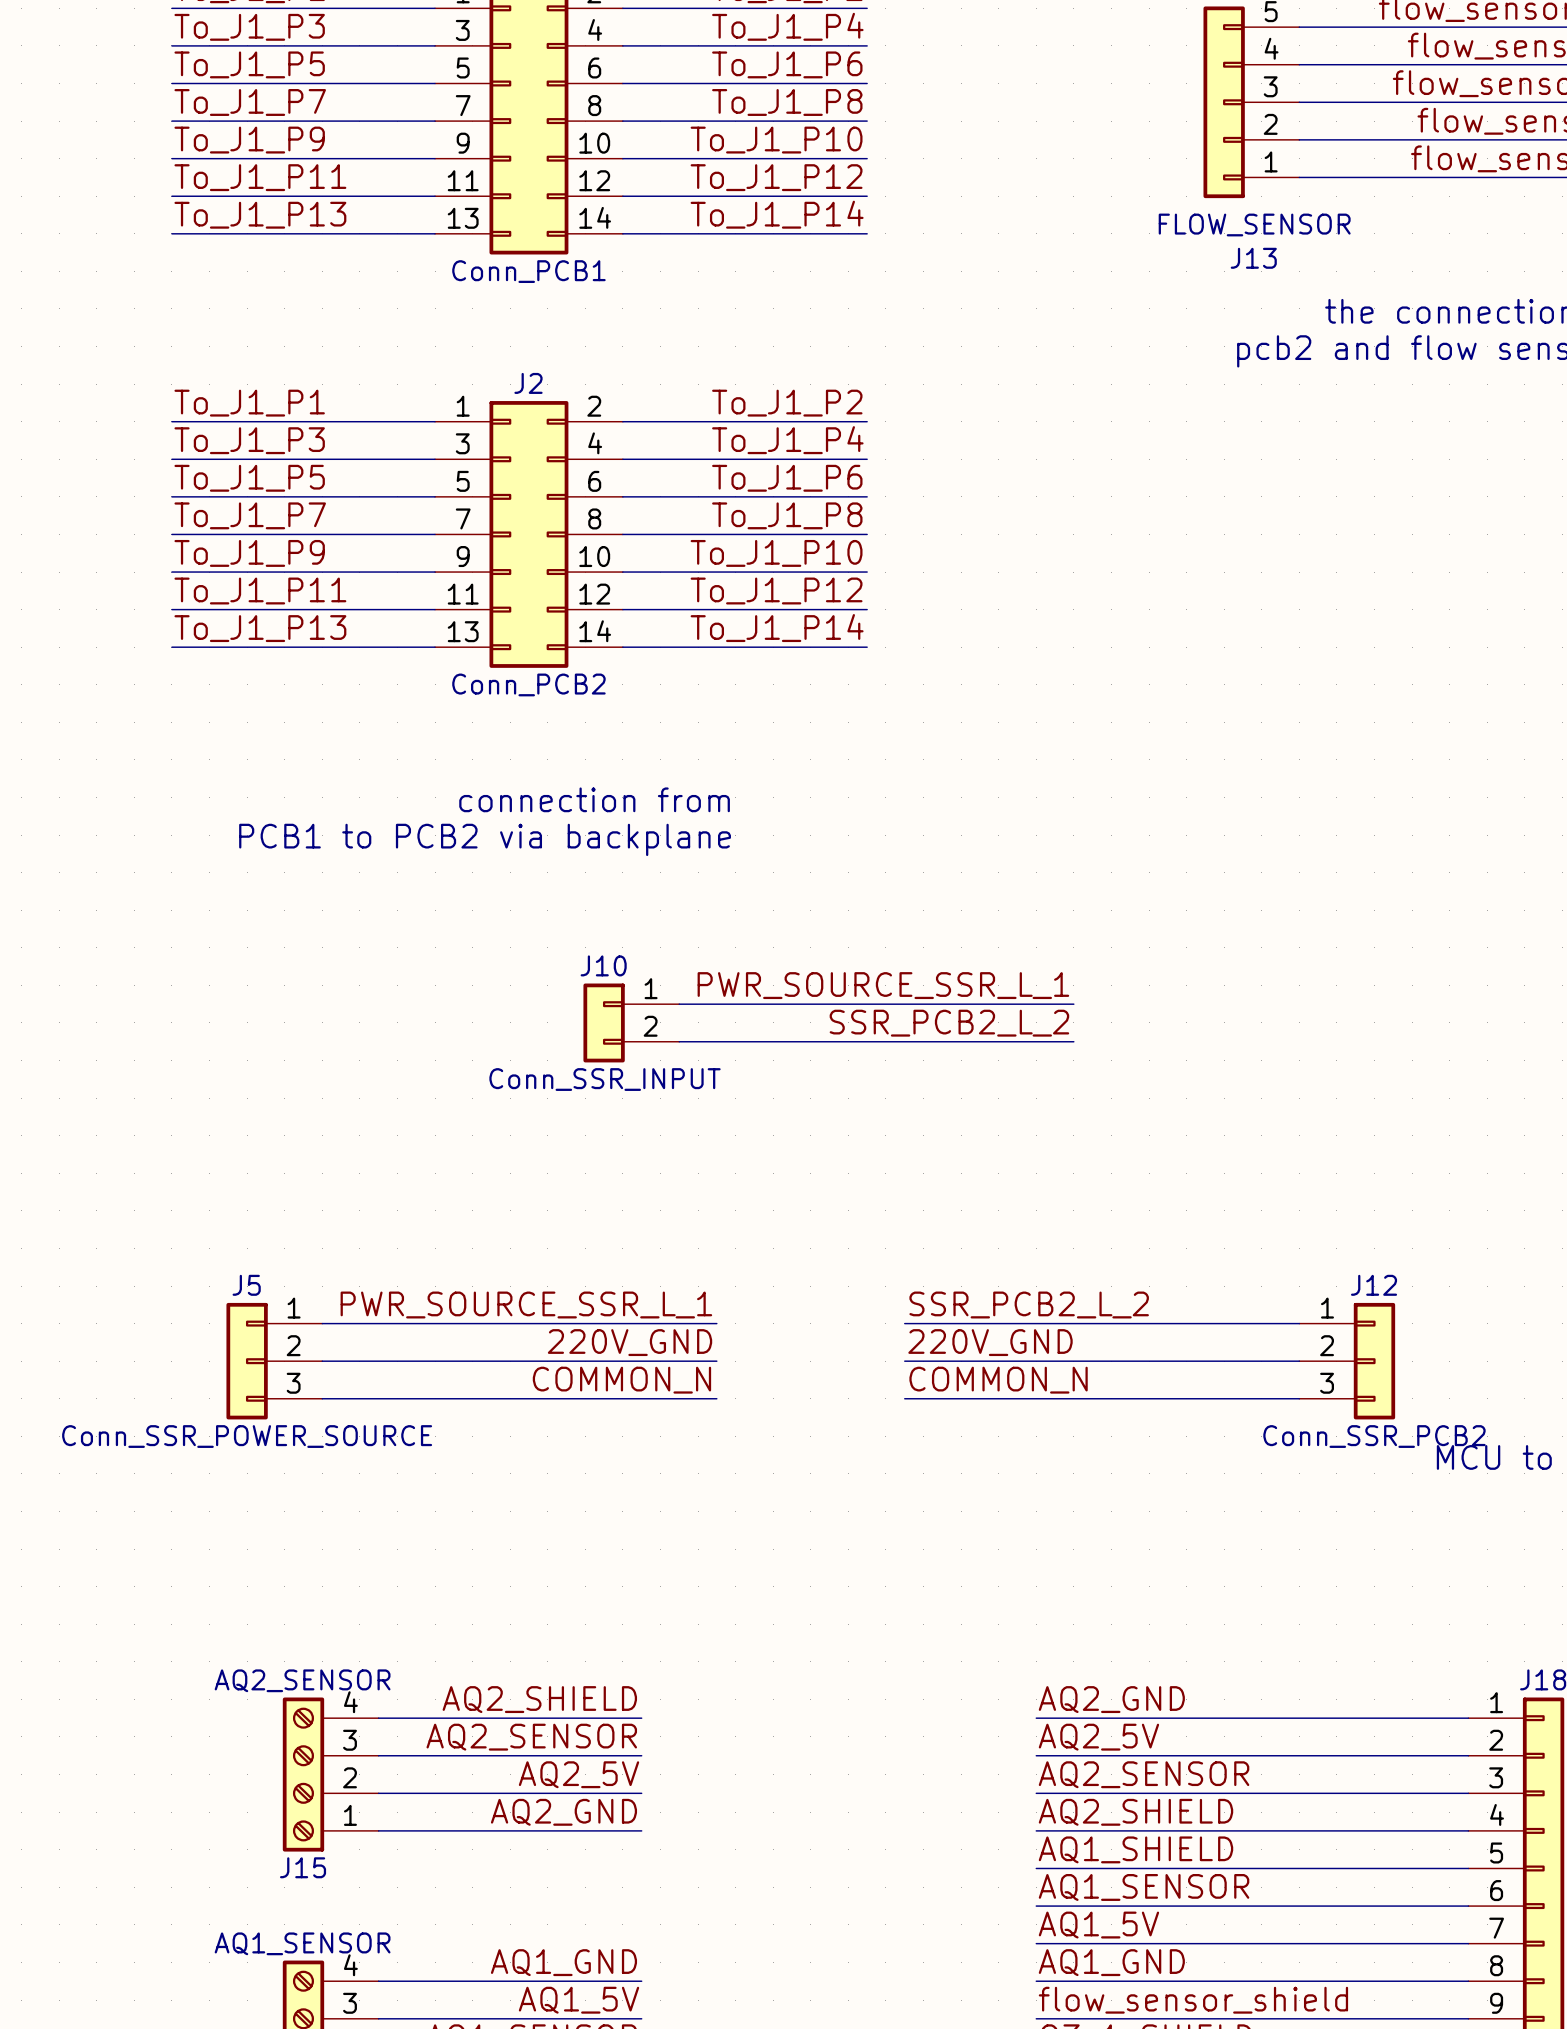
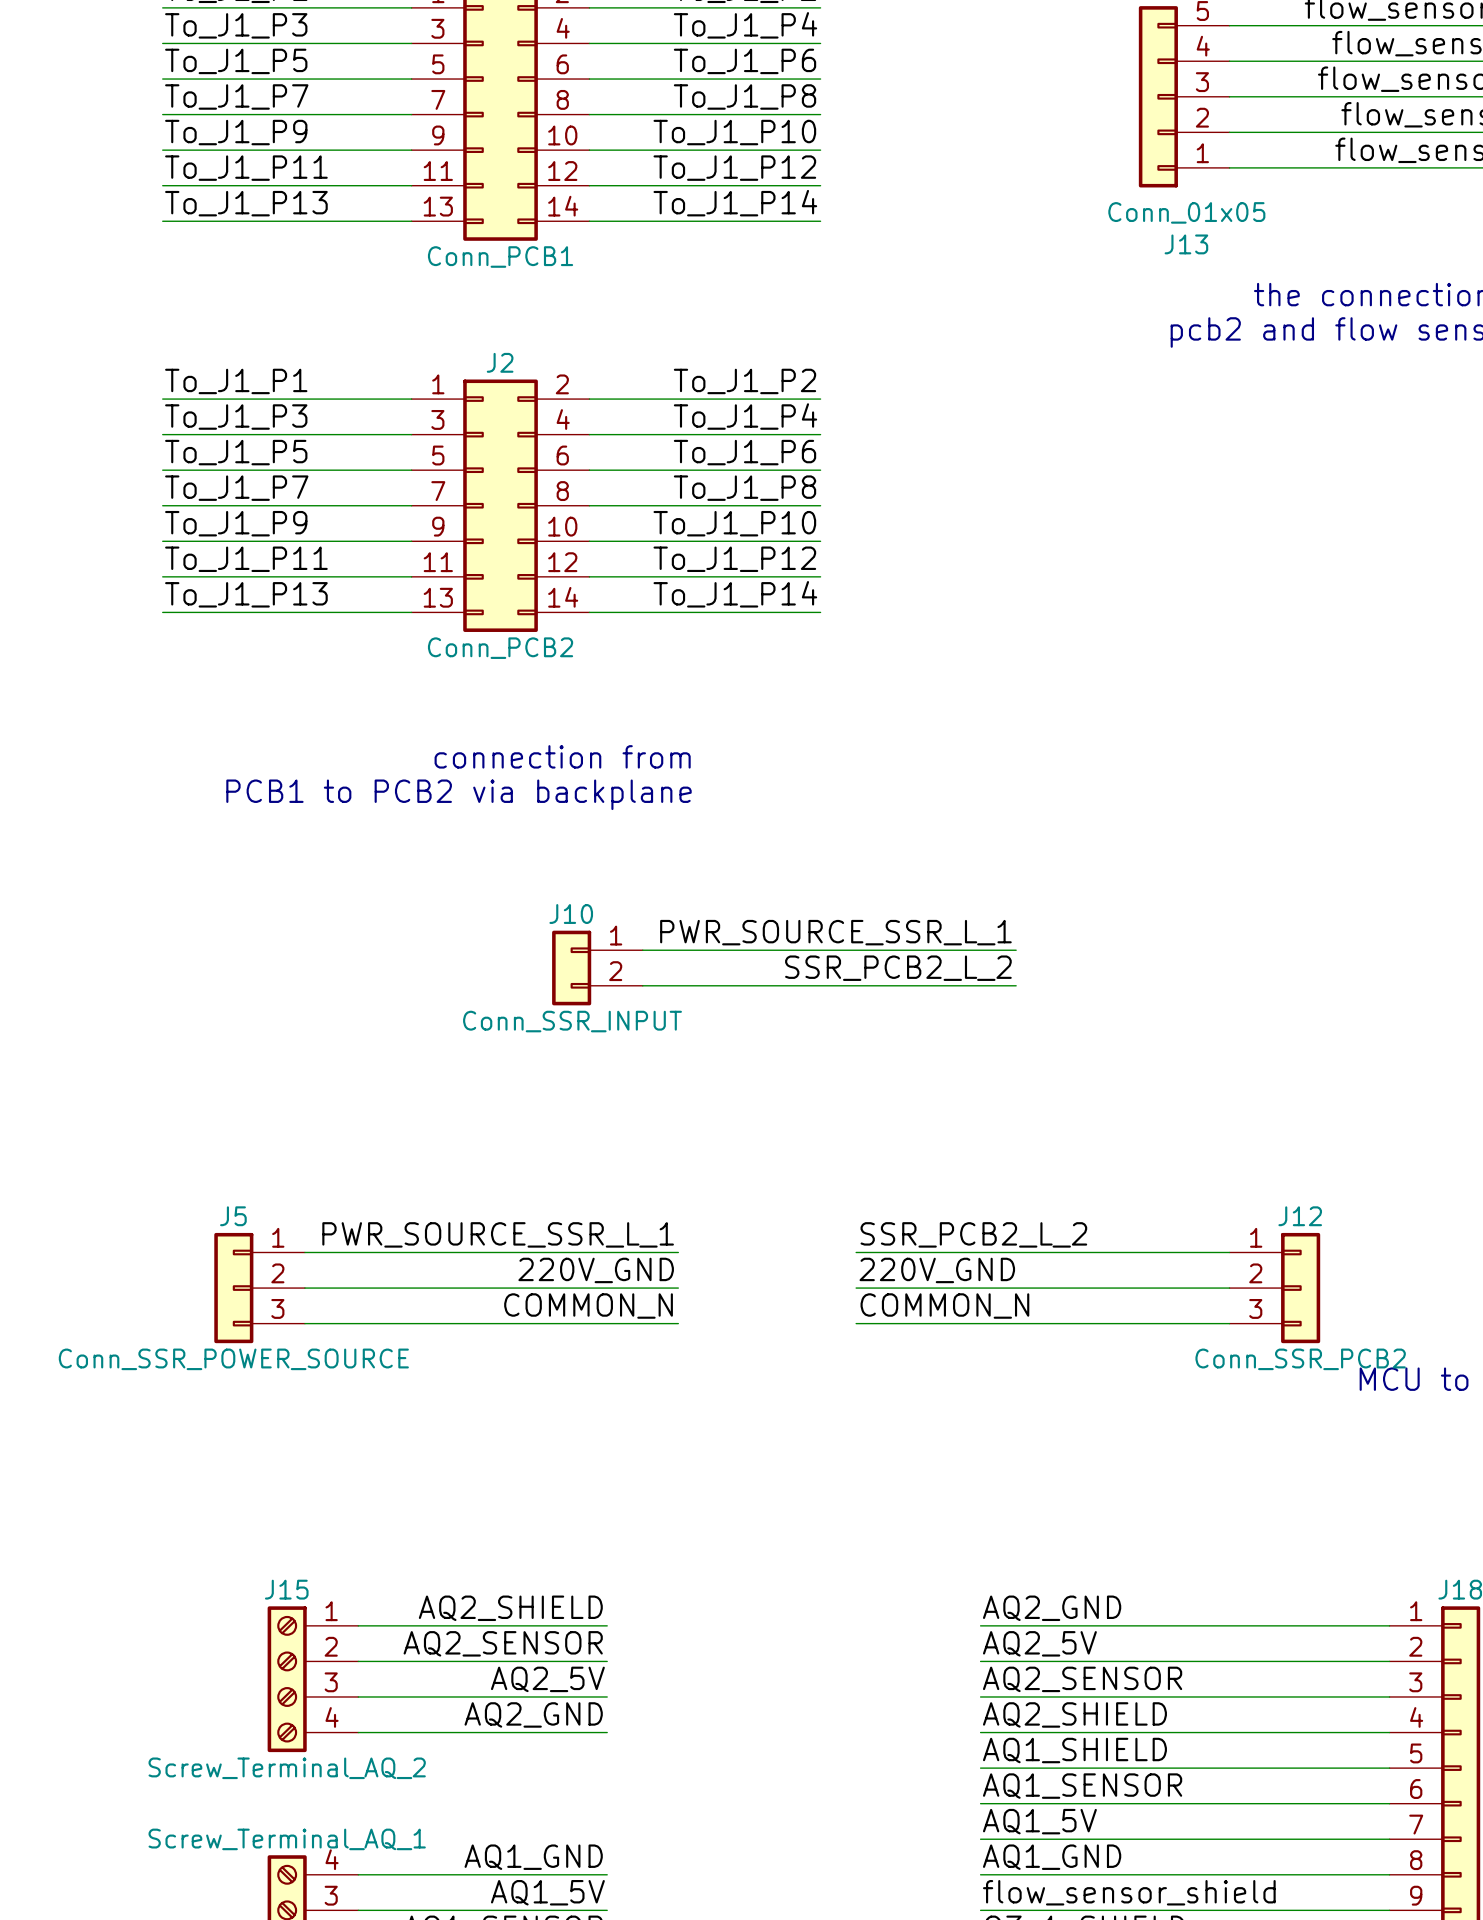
J13 value: FLOW_SENSOR (1254, 224) -> Conn_01x05 (1186, 212)
J15 value: AQ2_SENSOR (302, 1680) -> Screw_Terminal_AQ_2 (287, 1768)
J15 flip: as is (303, 1774) -> up-down (287, 1679)
part value: AQ1_SENSOR (302, 1943) -> Screw_Terminal_AQ_1 (287, 1839)

